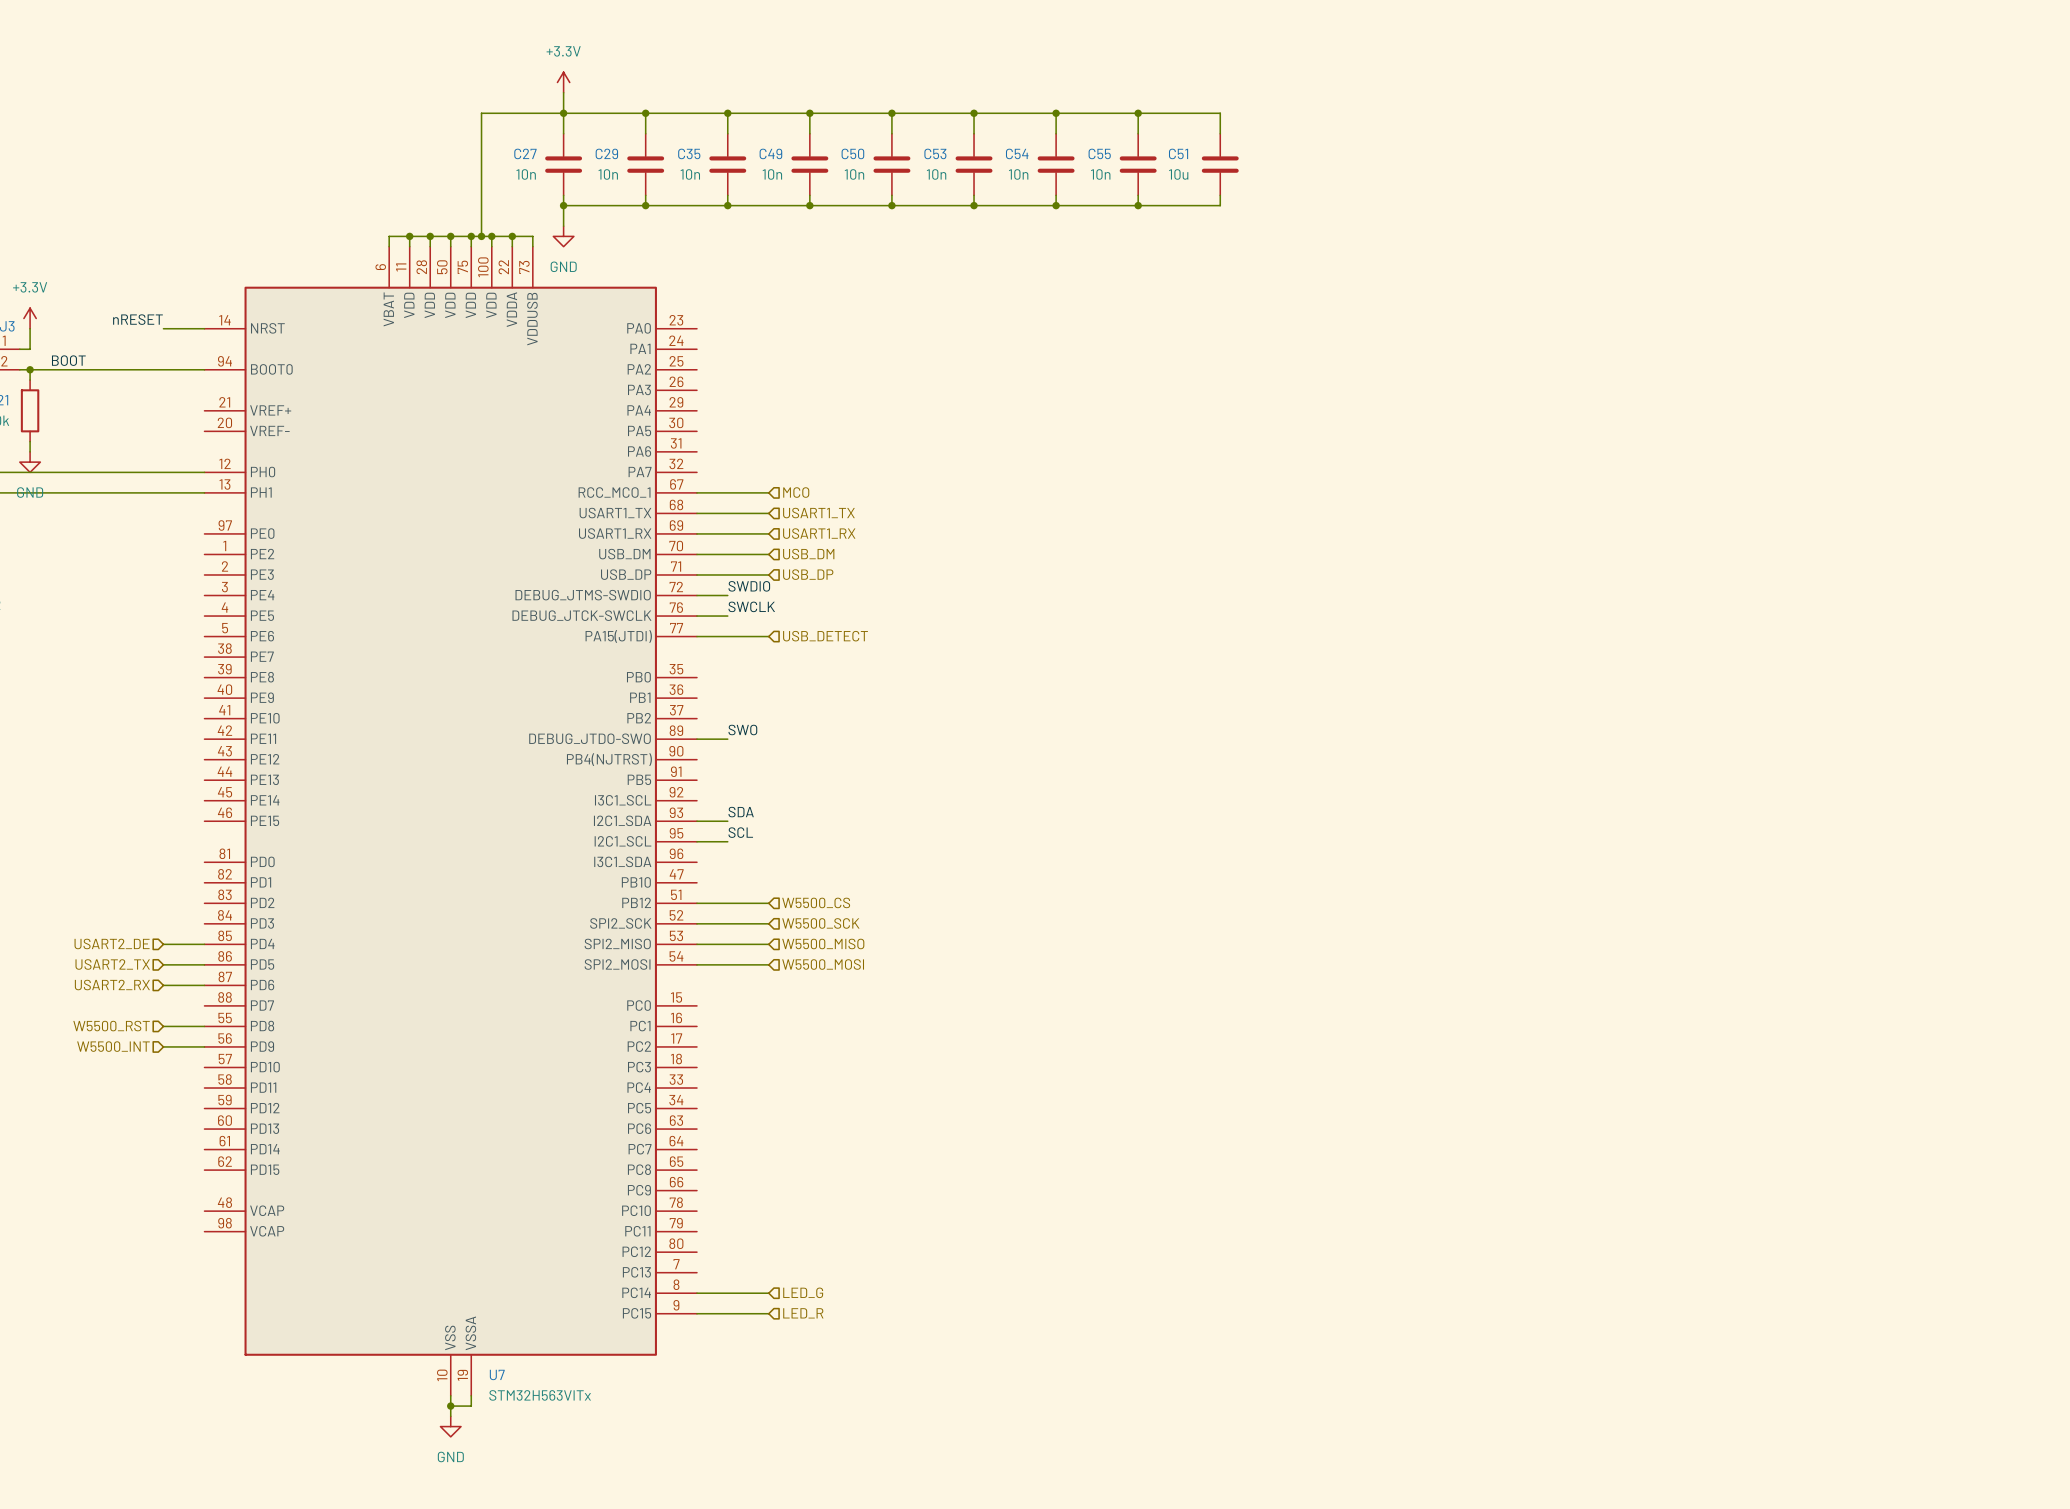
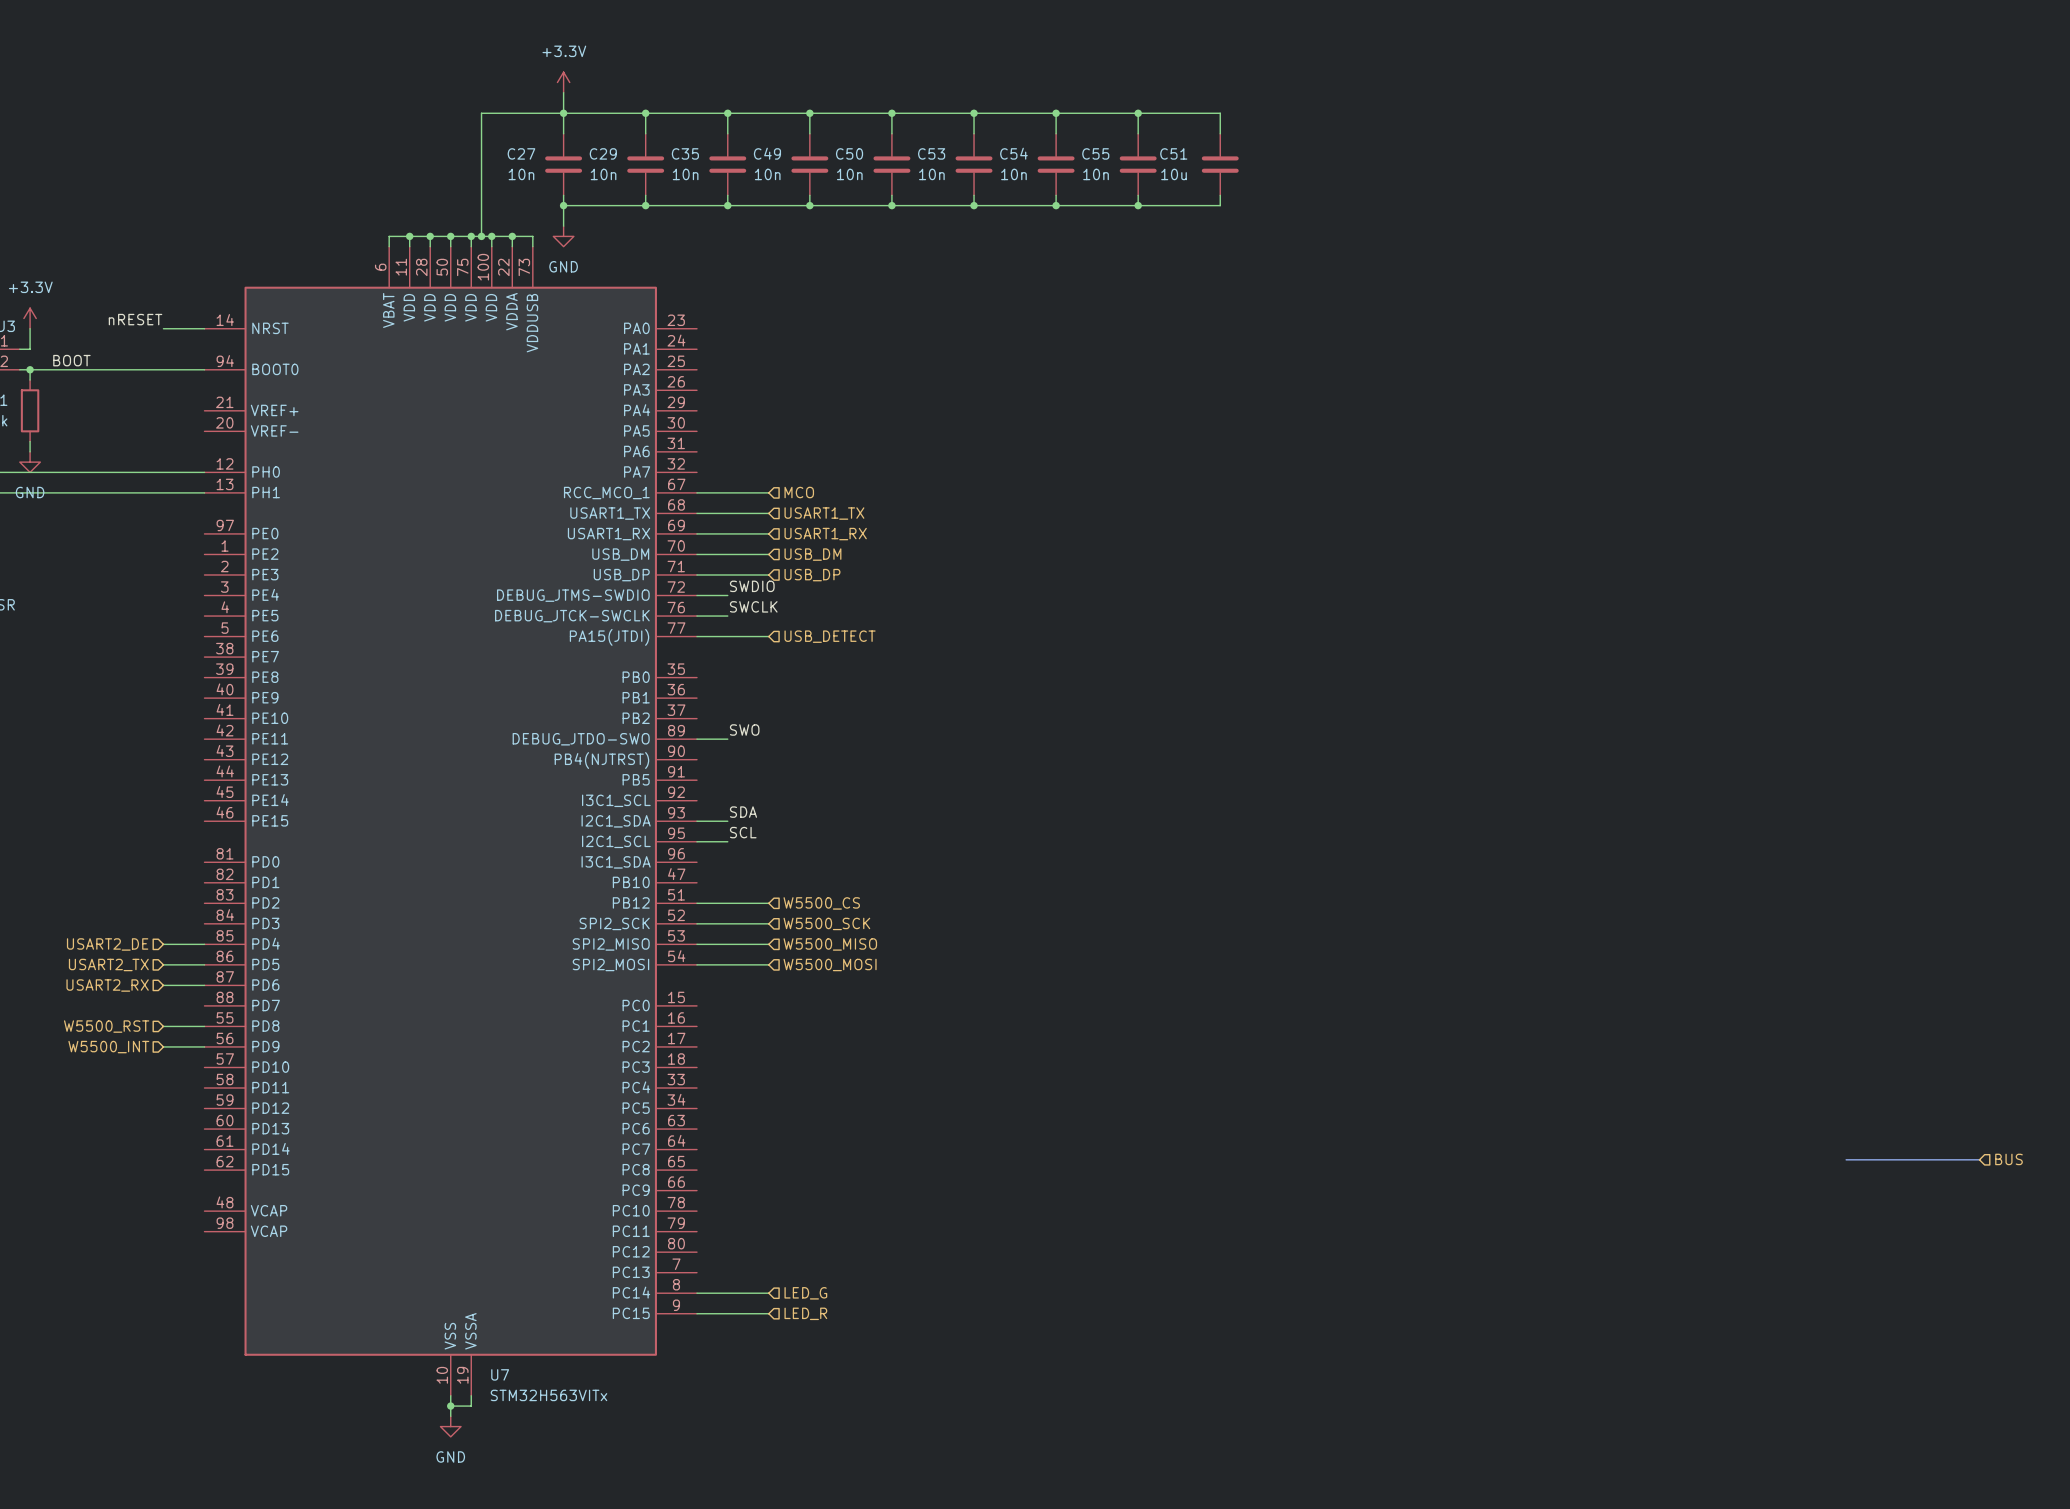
bus: none -> (1846, 1159) (1979, 1159)
hierarchical label: none -> BUS (2008, 1159)

